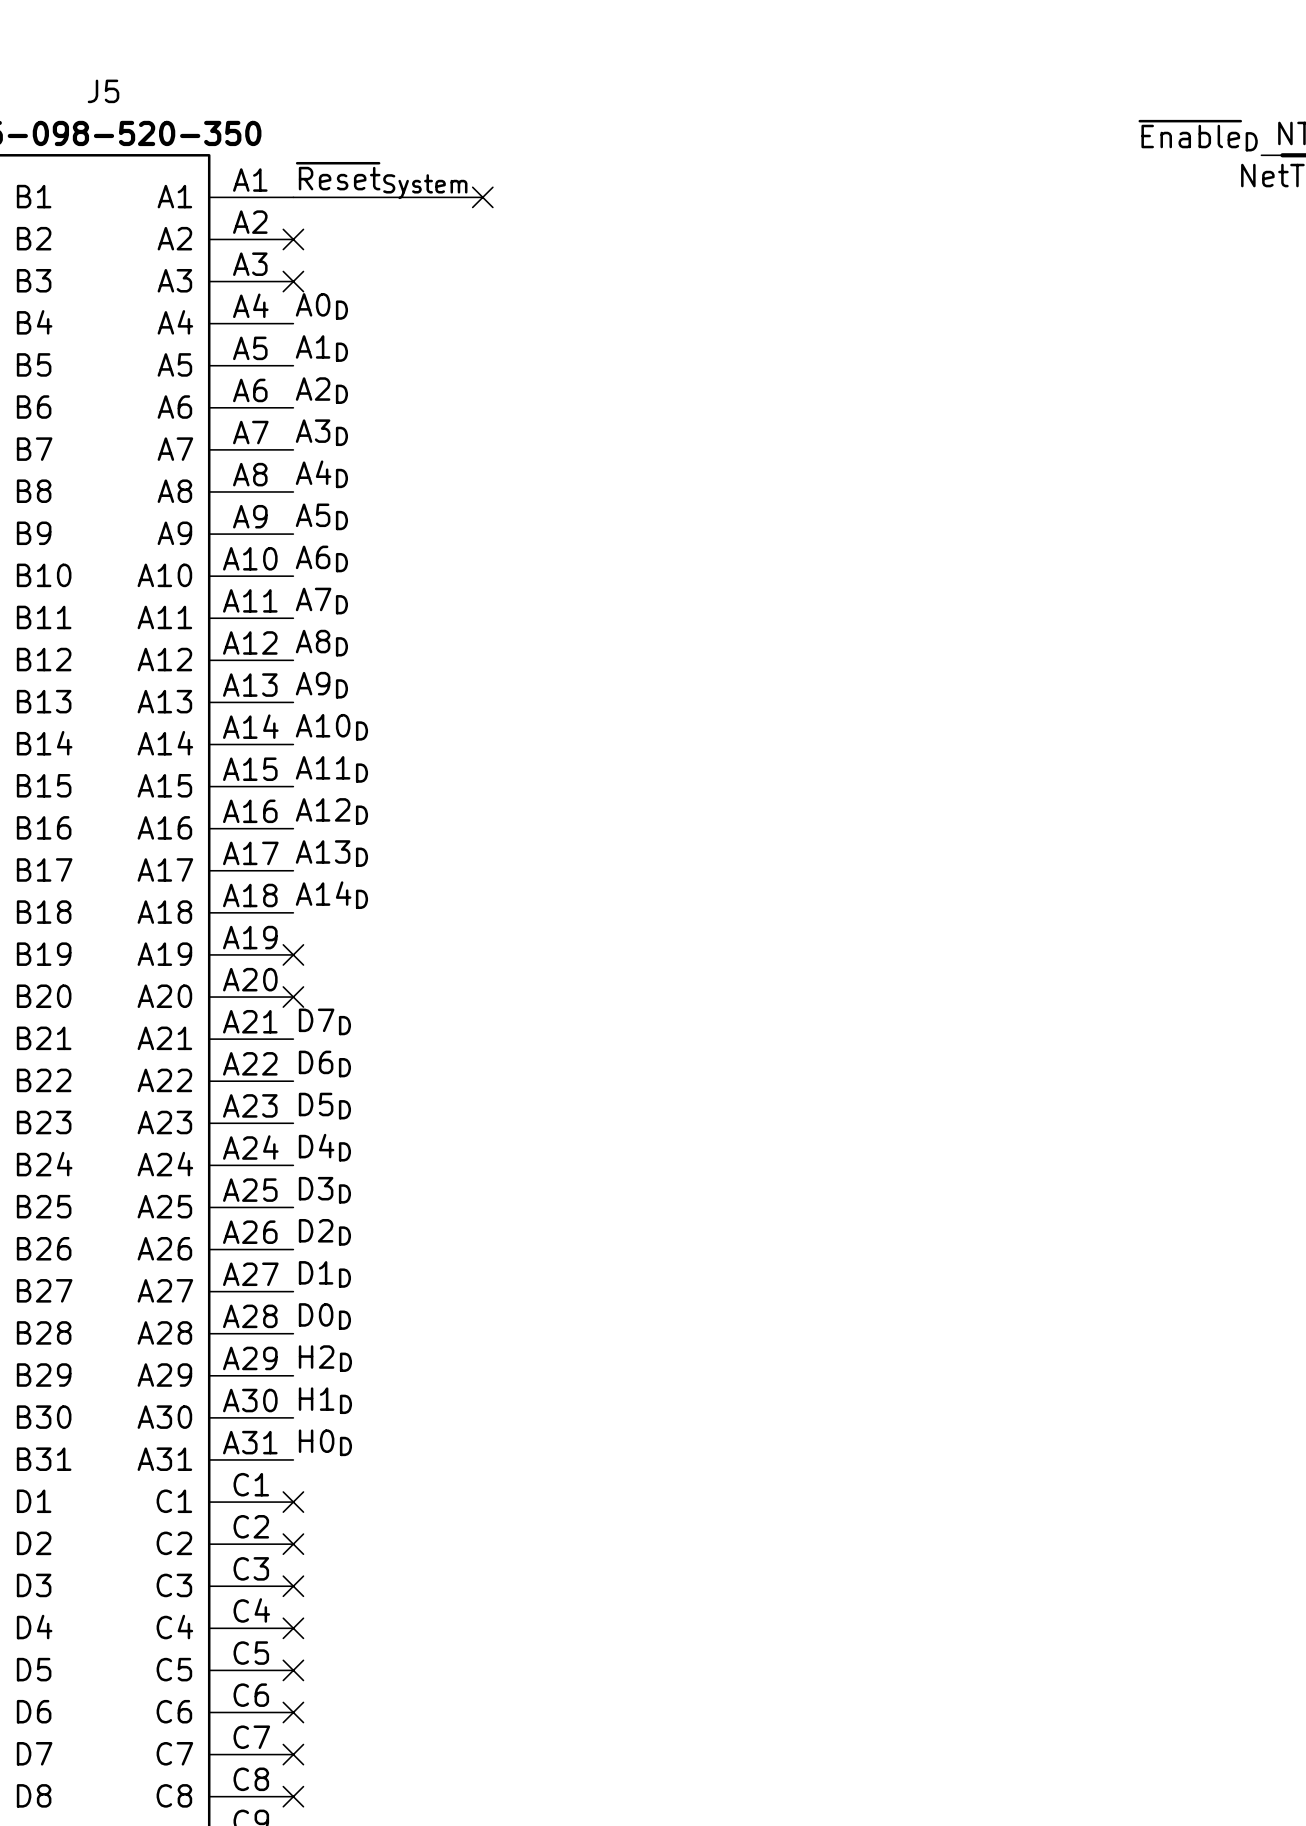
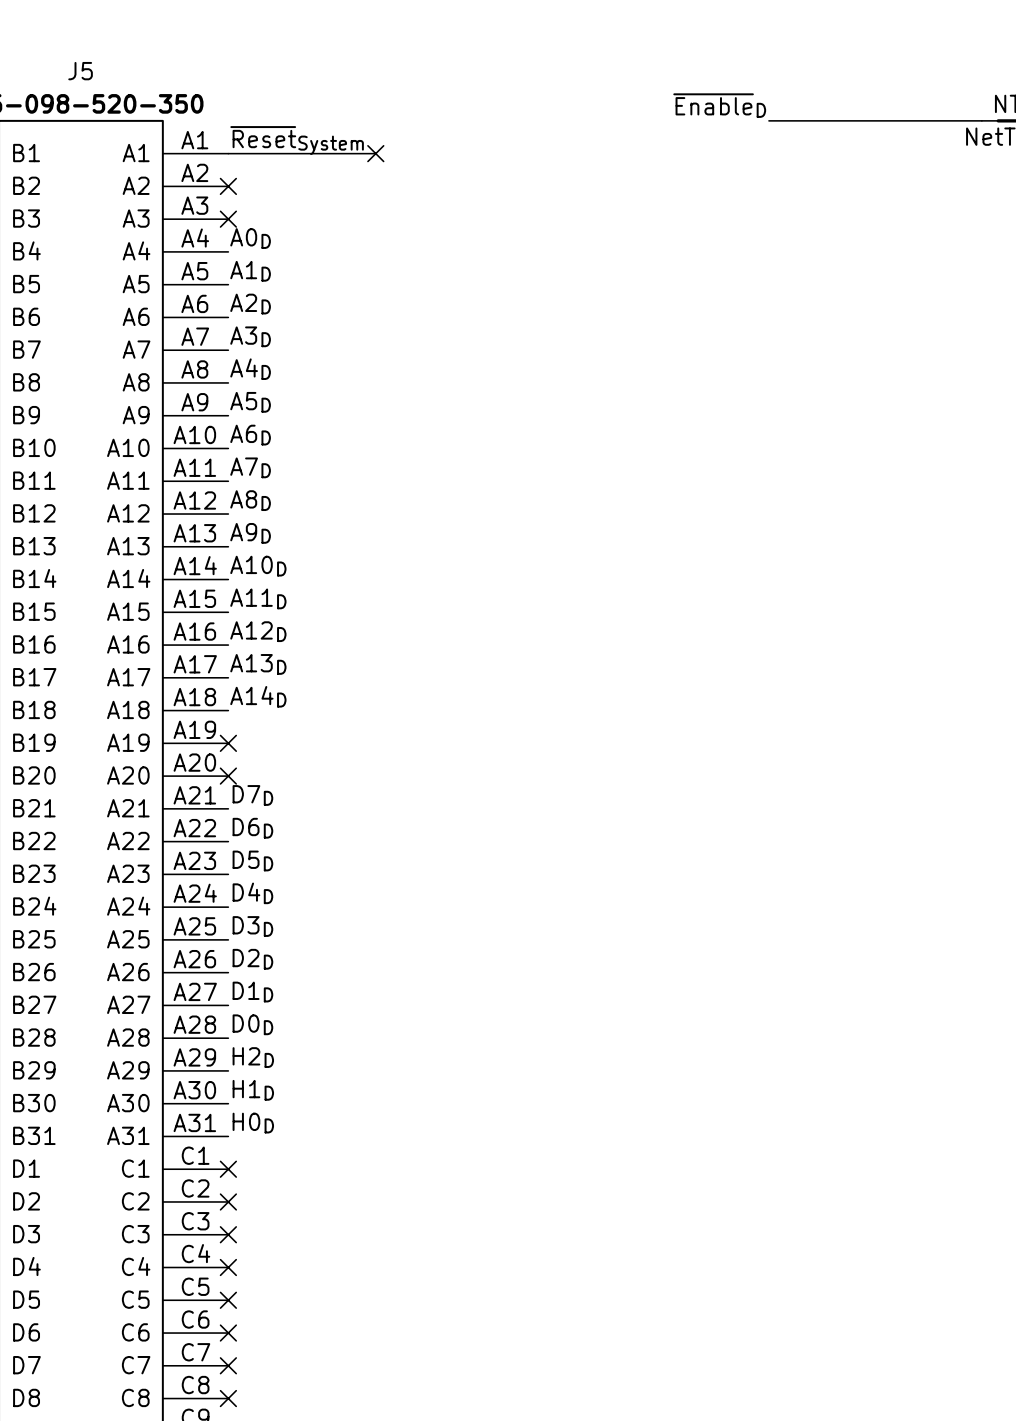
label position: ~{Enable}D (1198, 135) -> ~{Enable}D (719, 105)
wire: none -> (768, 120) (981, 120)

